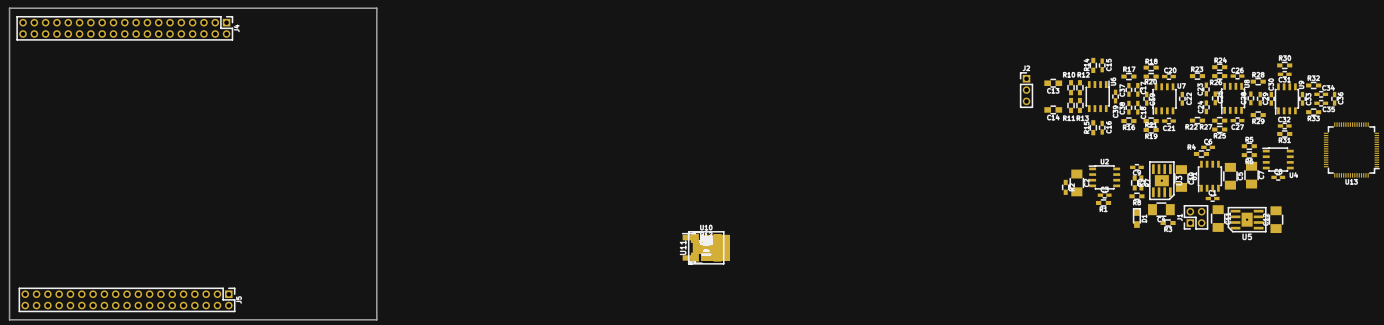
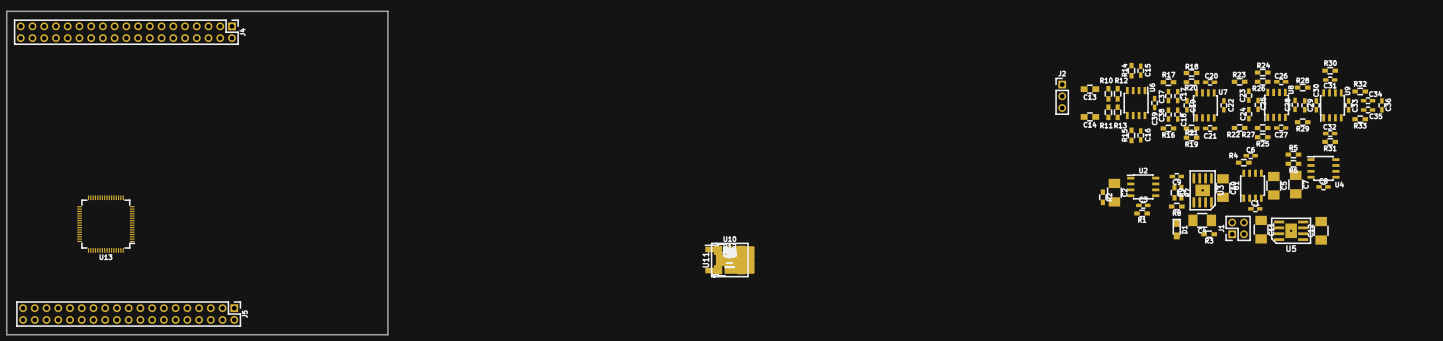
part position: (1351, 150) -> (106, 224)

